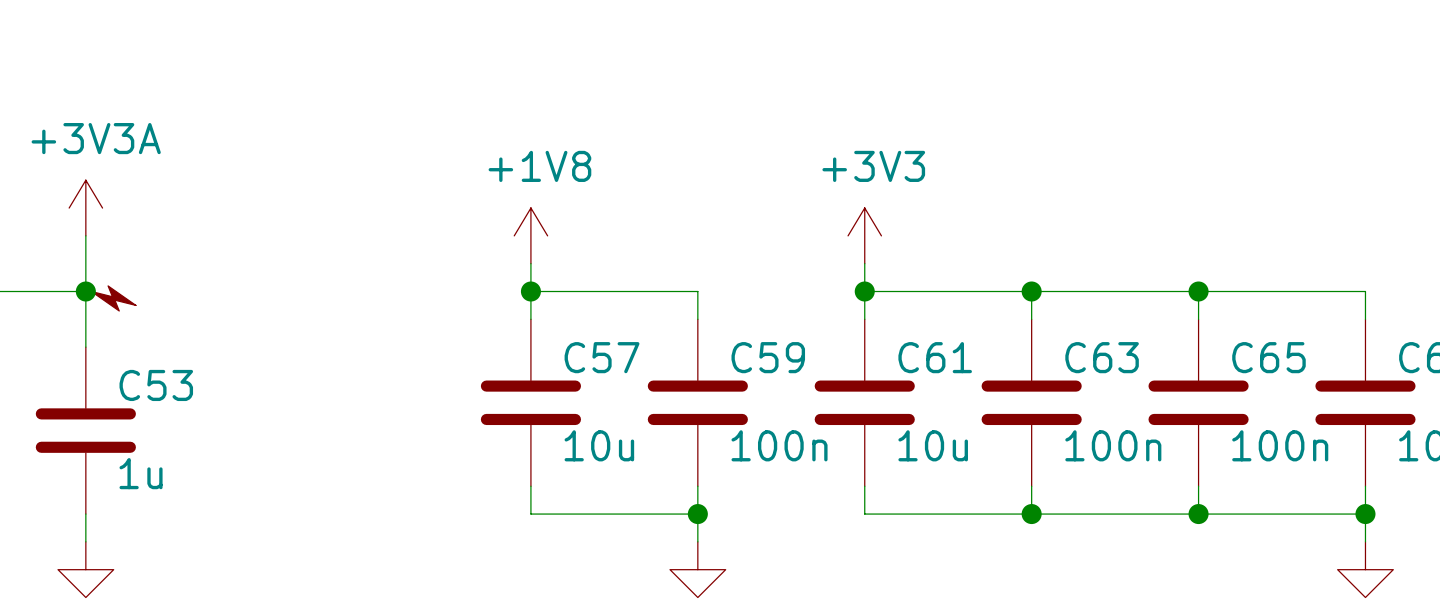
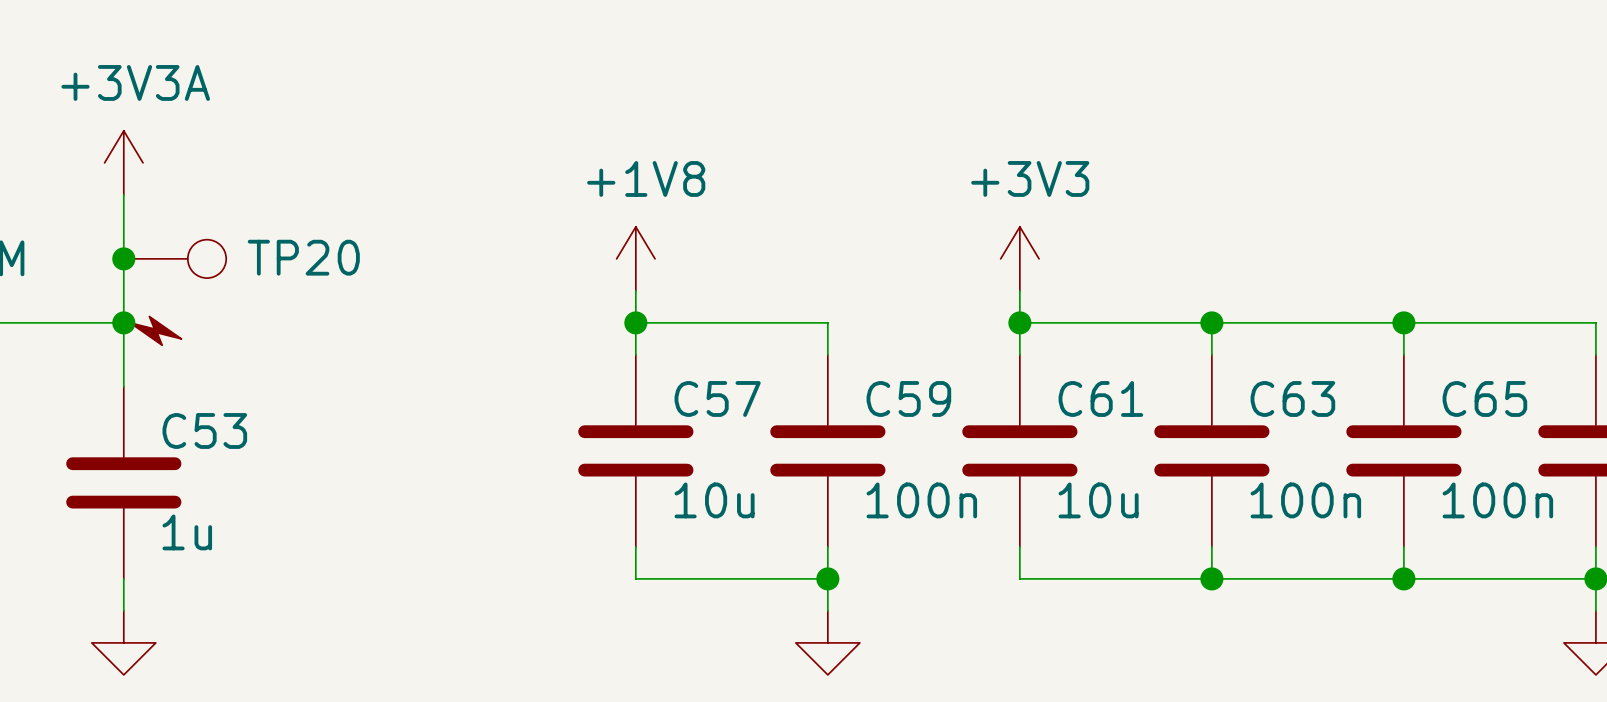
power symbol position: +3V3A (85, 208) -> +3V3A (123, 162)
junction: none -> (123, 258)
TP20: none -> (175, 258)

